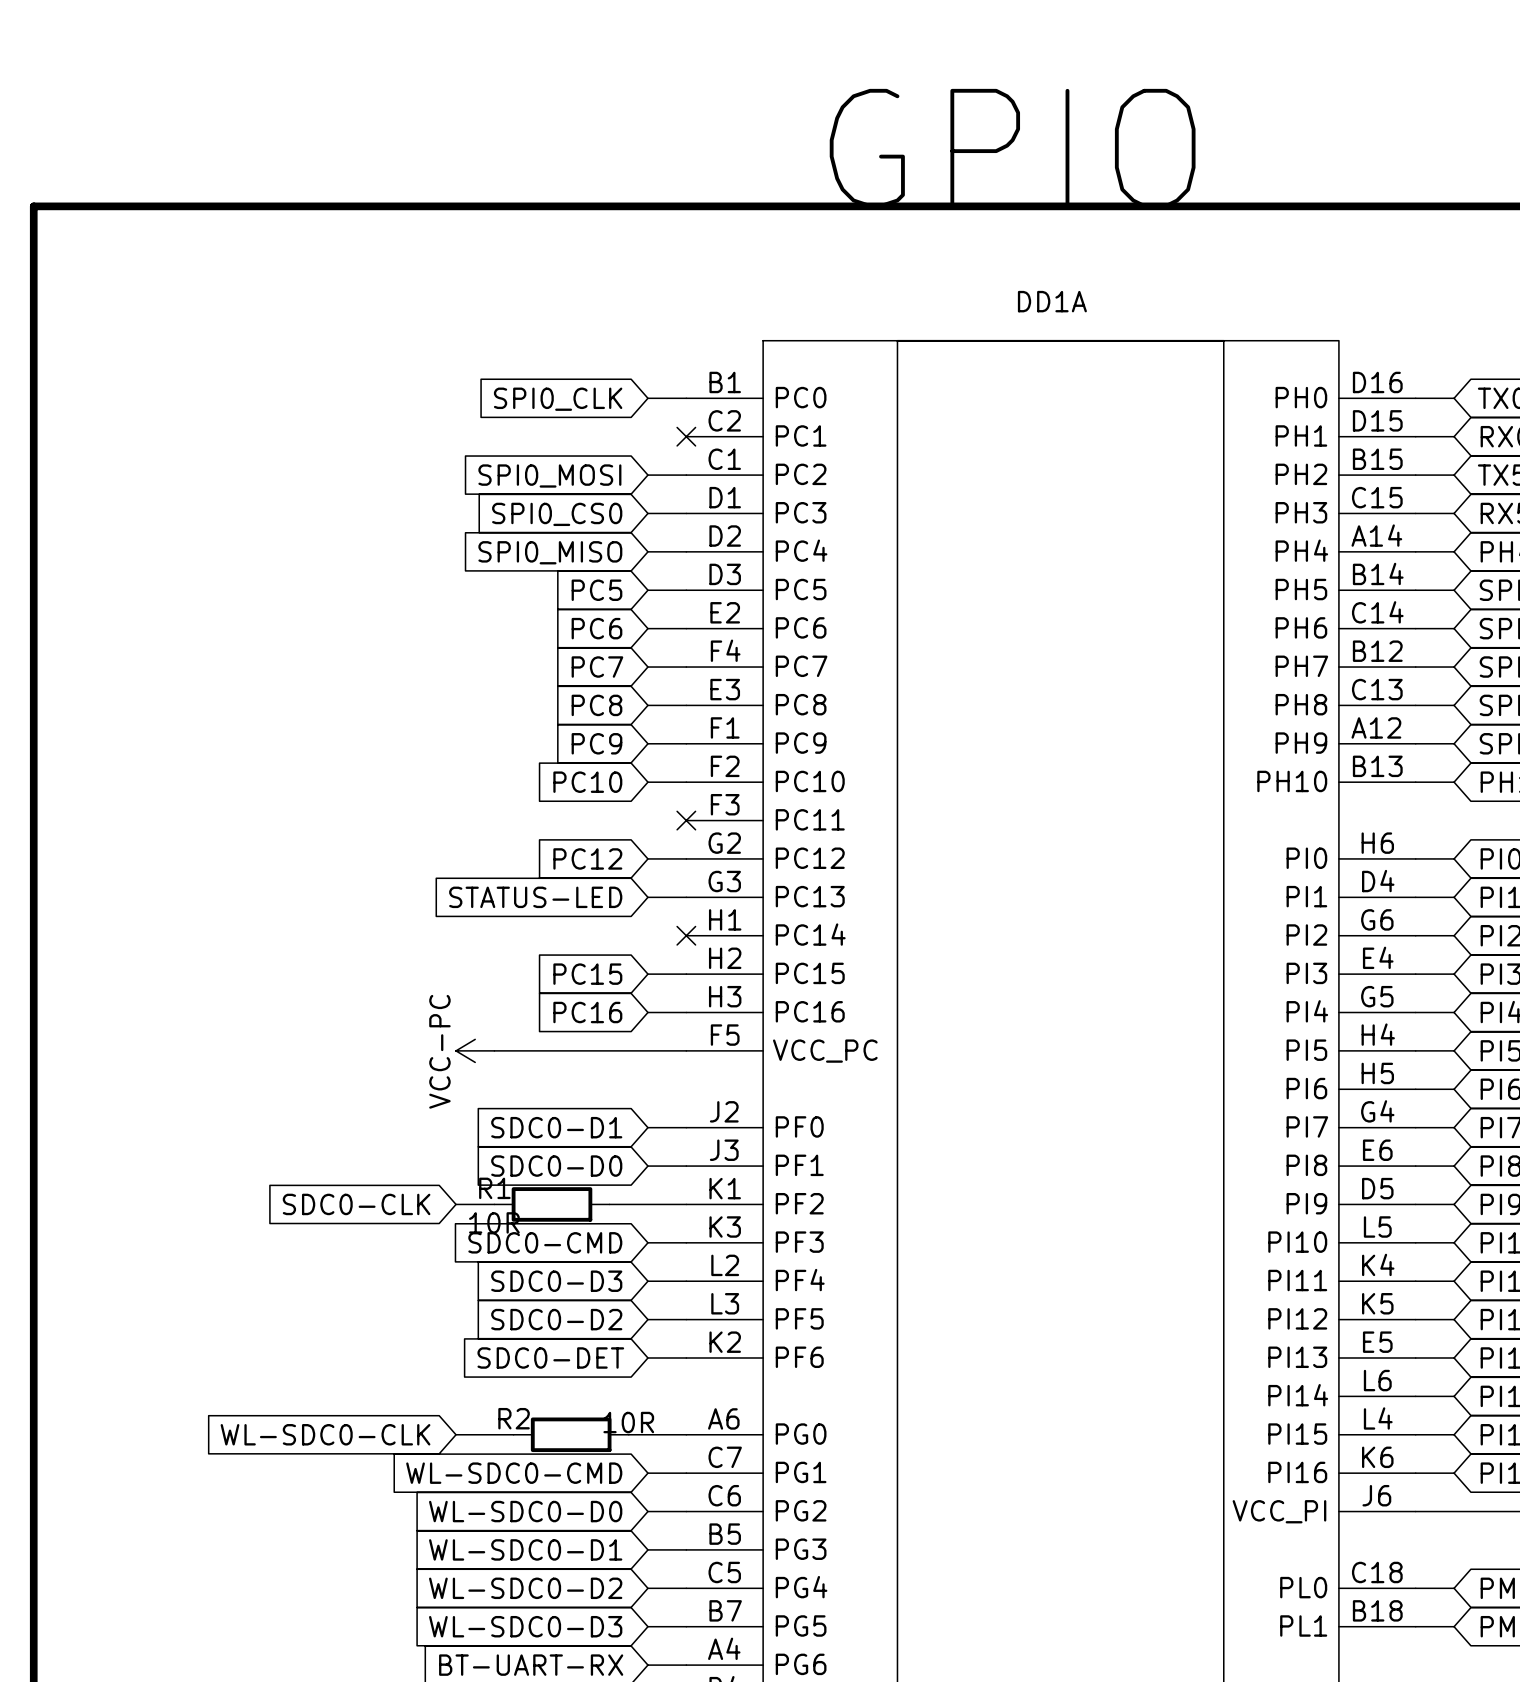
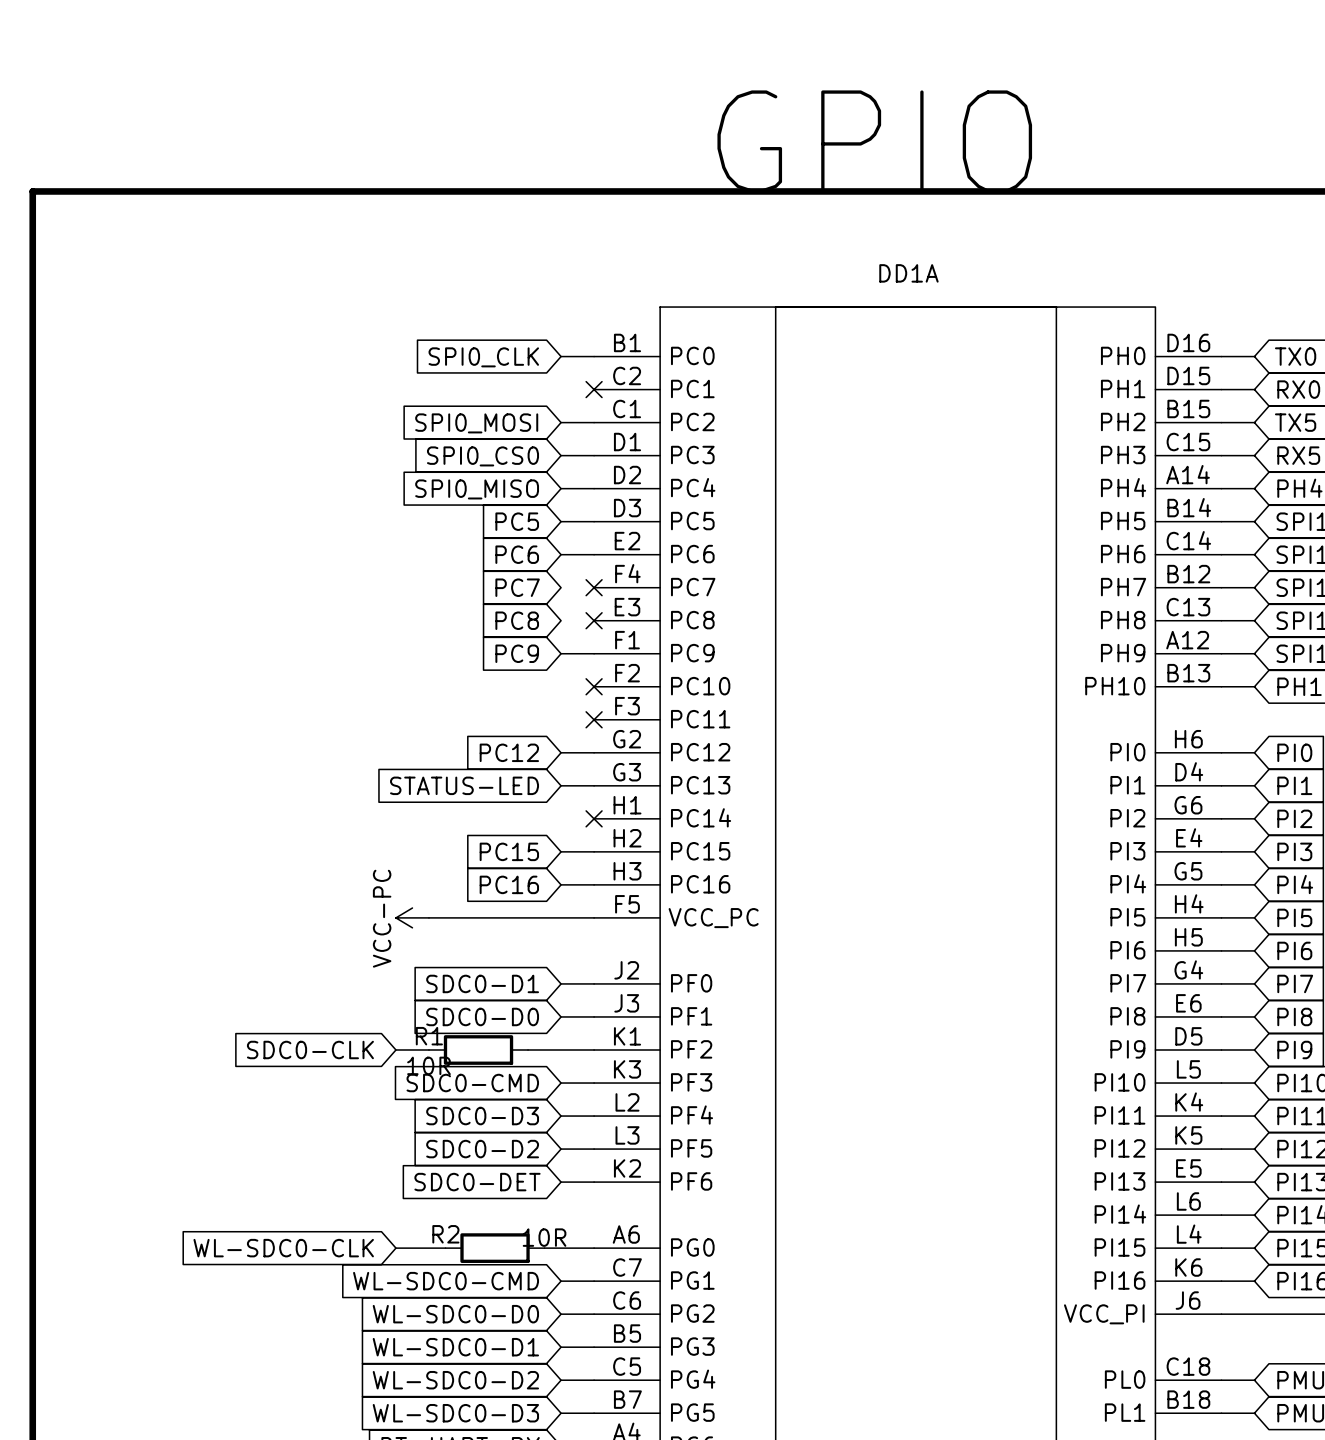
wire: (647, 667) (686, 667) -> none
no-connect mark: none -> (594, 587)
wire: (647, 705) (686, 705) -> none
no-connect mark: none -> (594, 620)
global label: PC10 (587, 782) -> none
wire: (647, 782) (686, 782) -> none
no-connect mark: none -> (594, 686)

